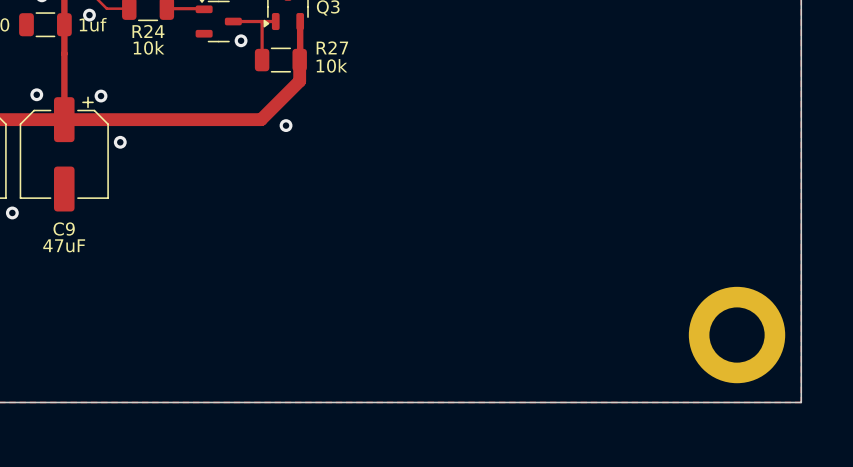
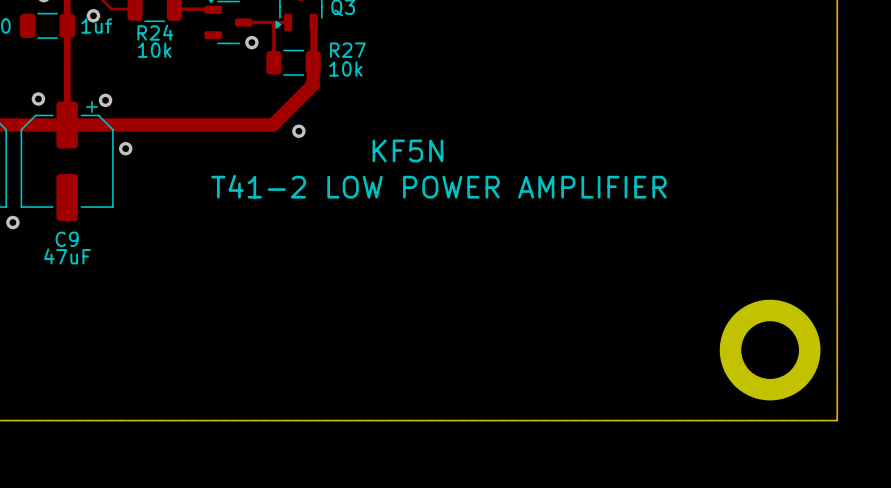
text: none -> KF5N (407, 150)
text: none -> T41-2 LOW POWER AMPLIFIER (438, 186)

